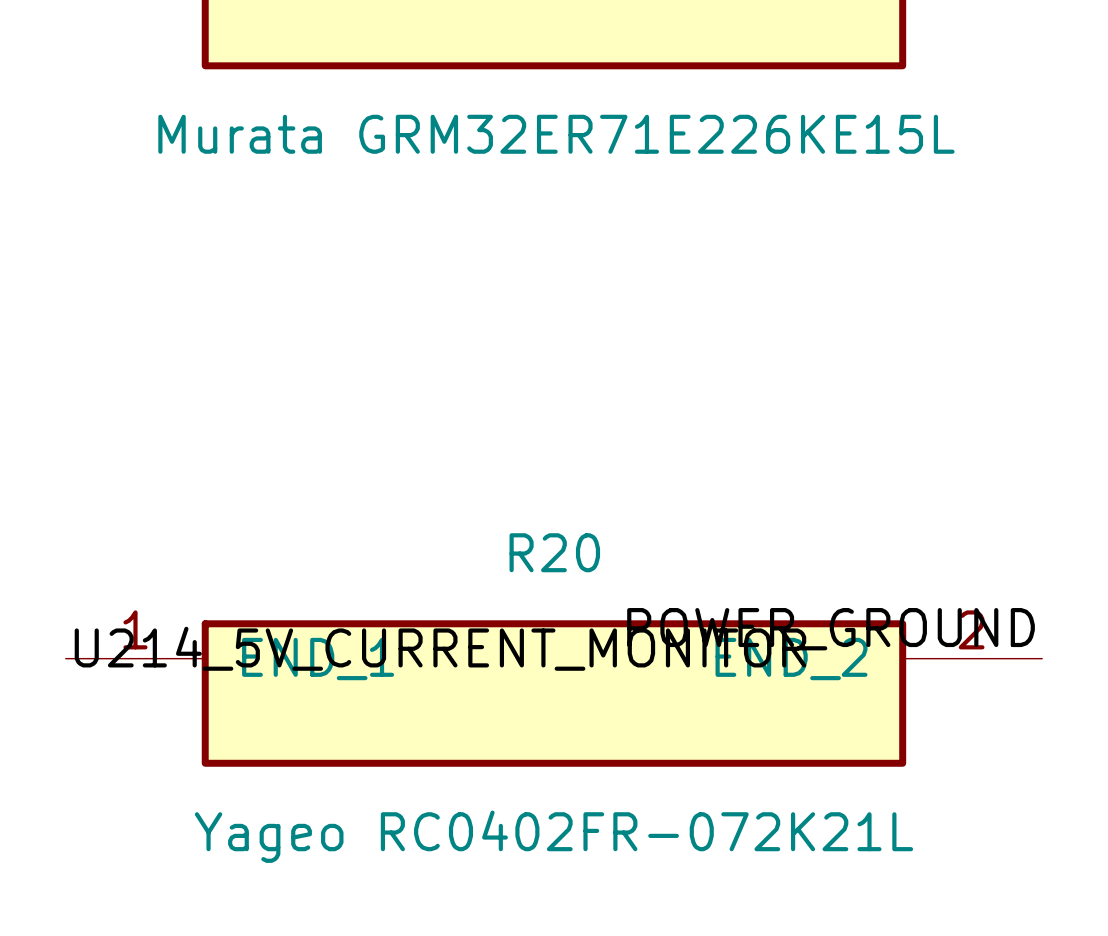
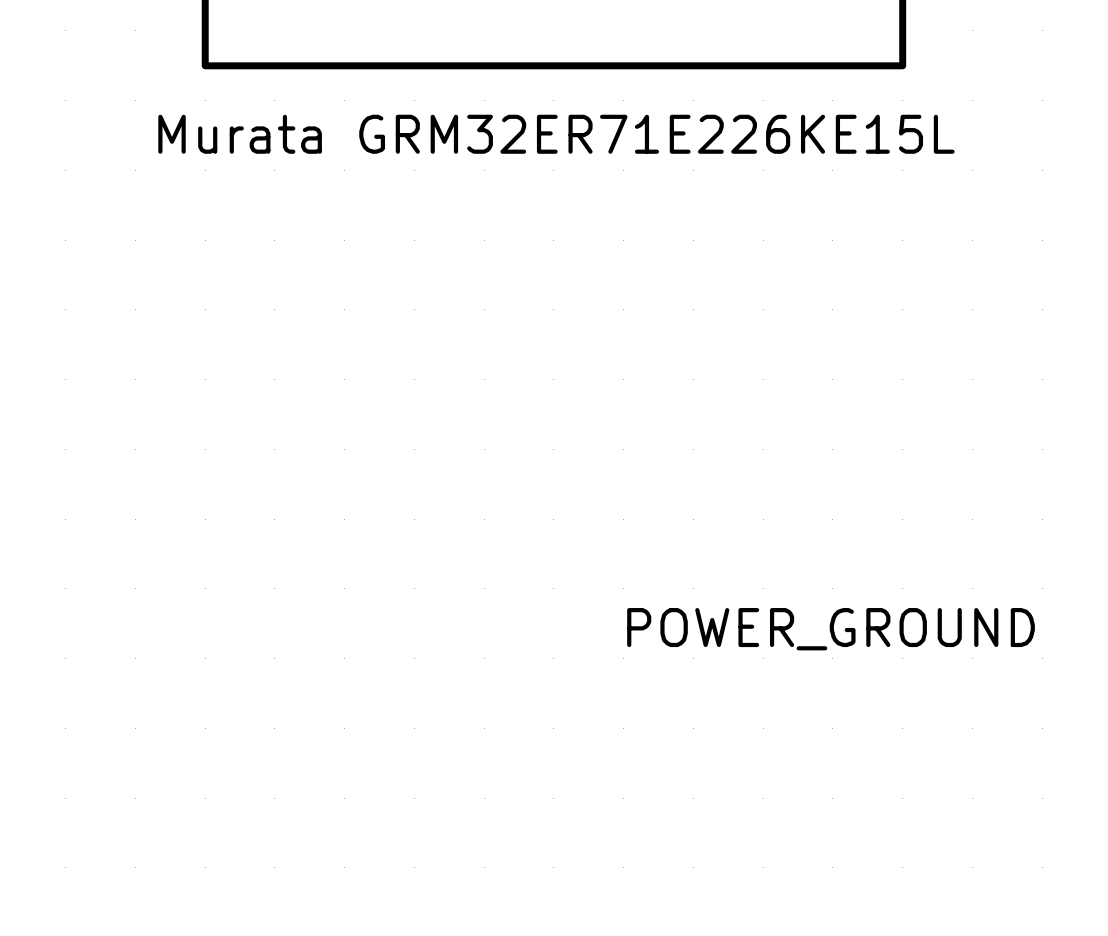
label: U214_5V_CURRENT_MONITOR (440, 648) -> none
R20: Yageo RC0402FR-072K21L (553, 693) -> none

